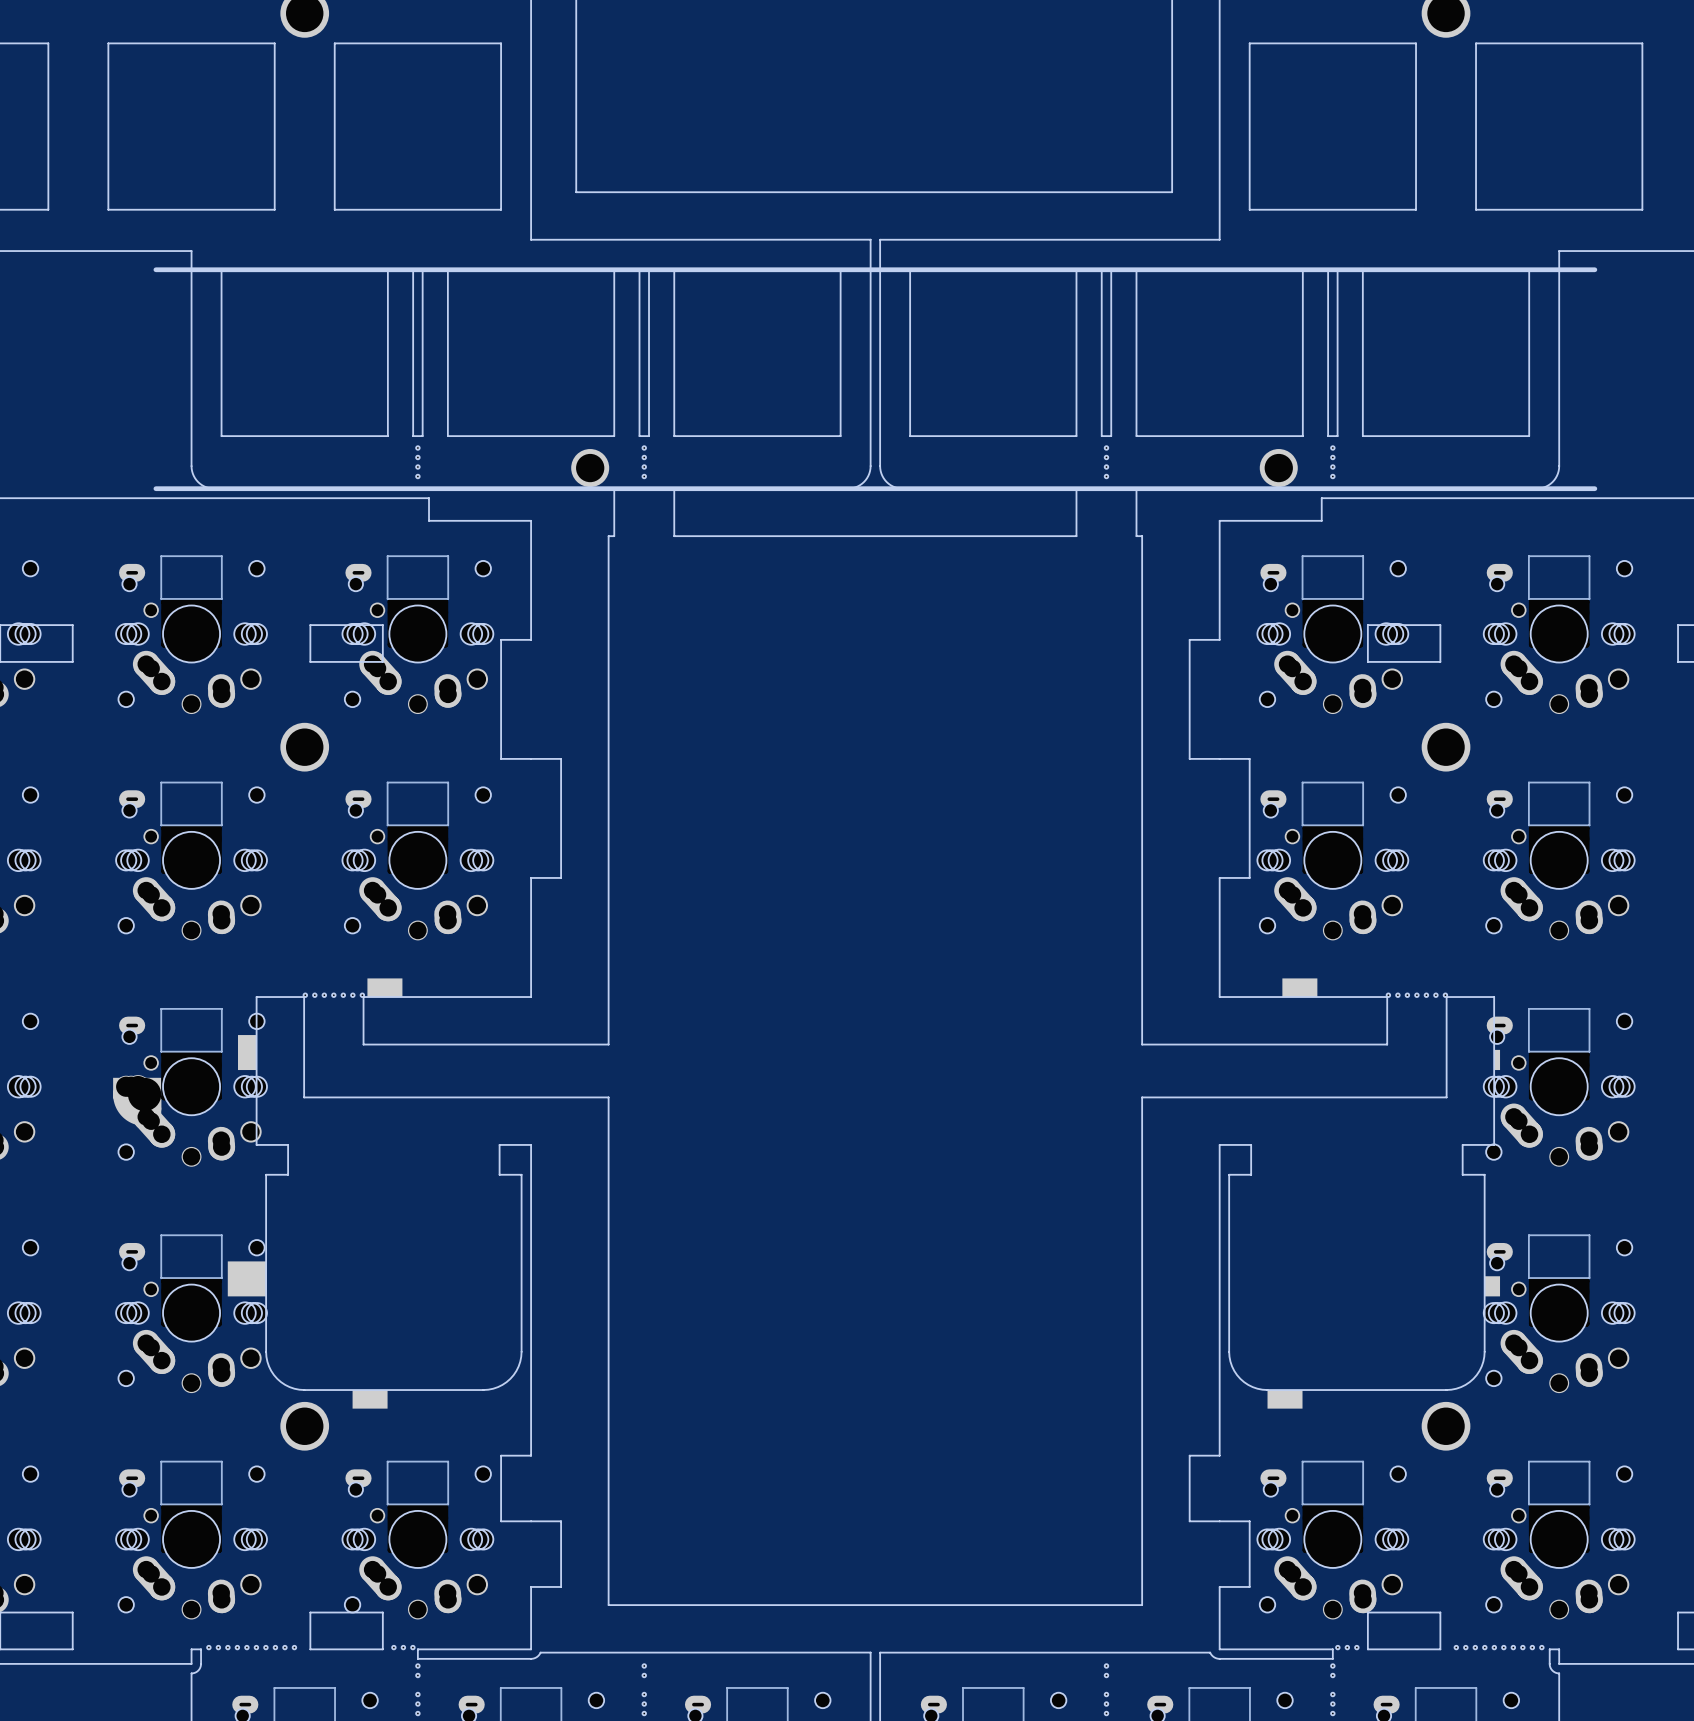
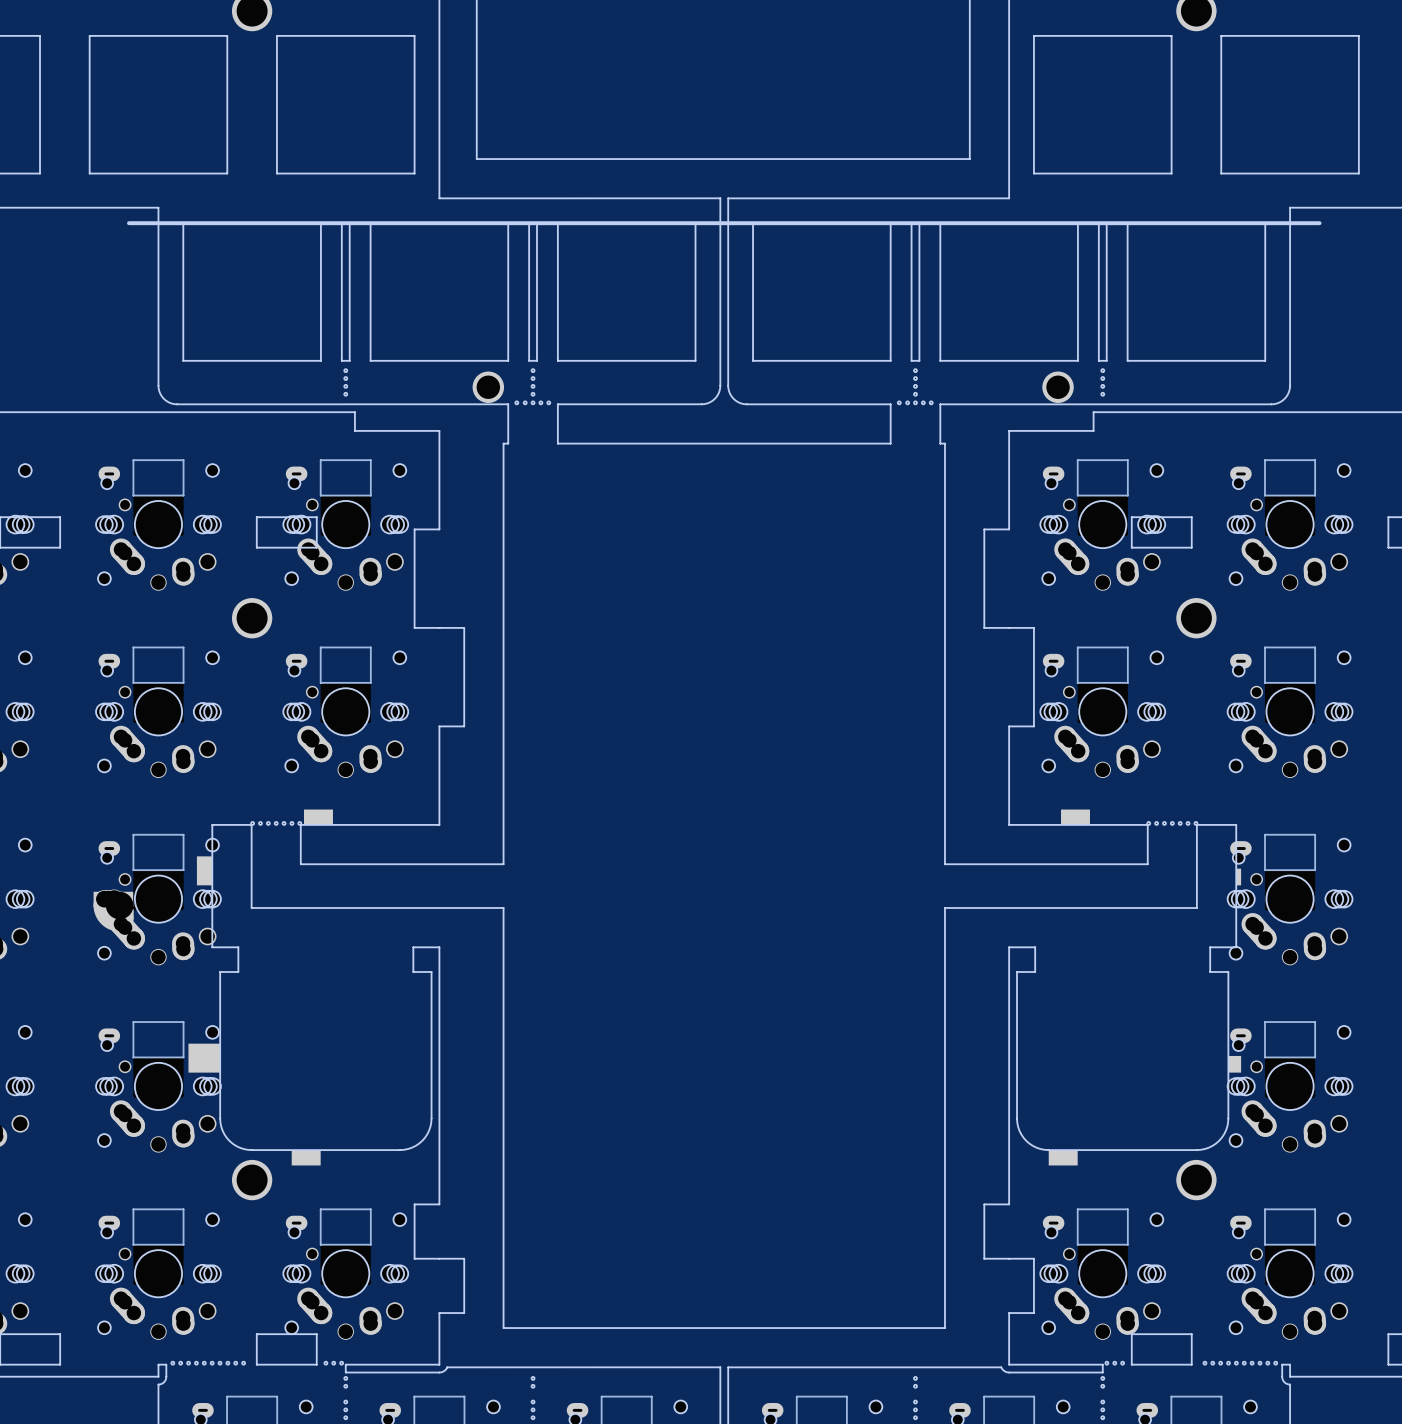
part: none -> (532, 402)
part: none -> (915, 402)
board edge: (1594, 488) (155, 488) -> none

